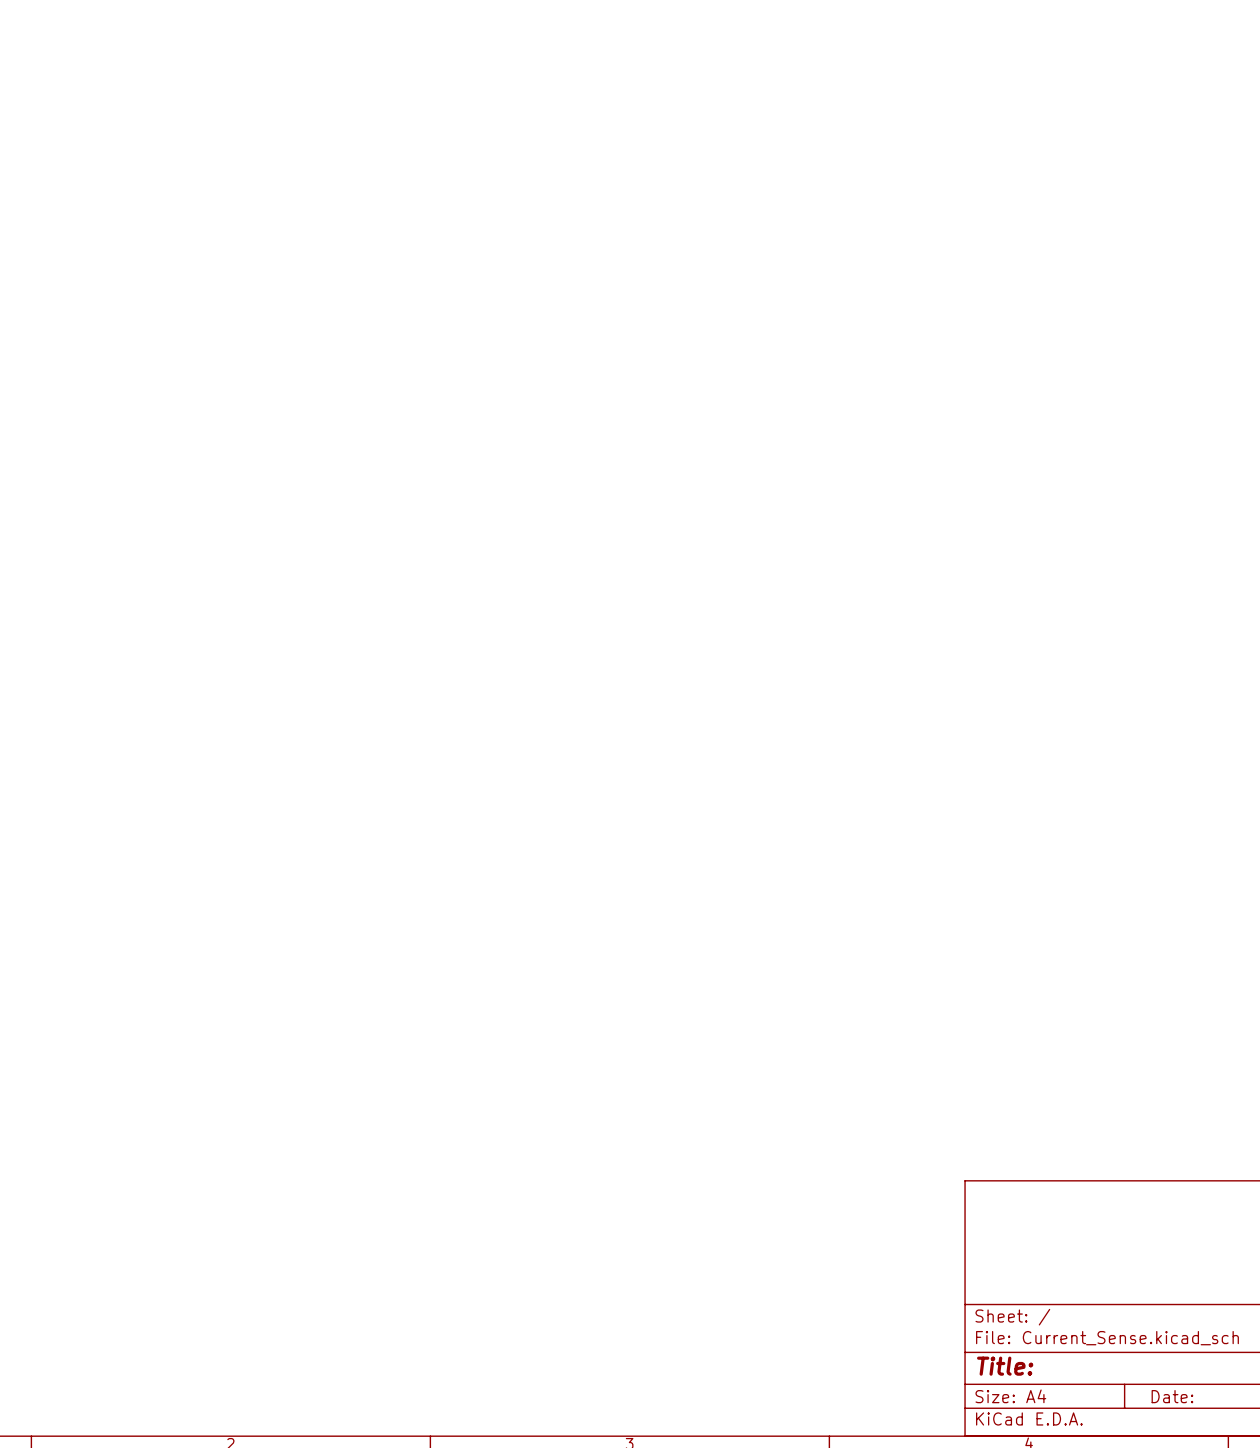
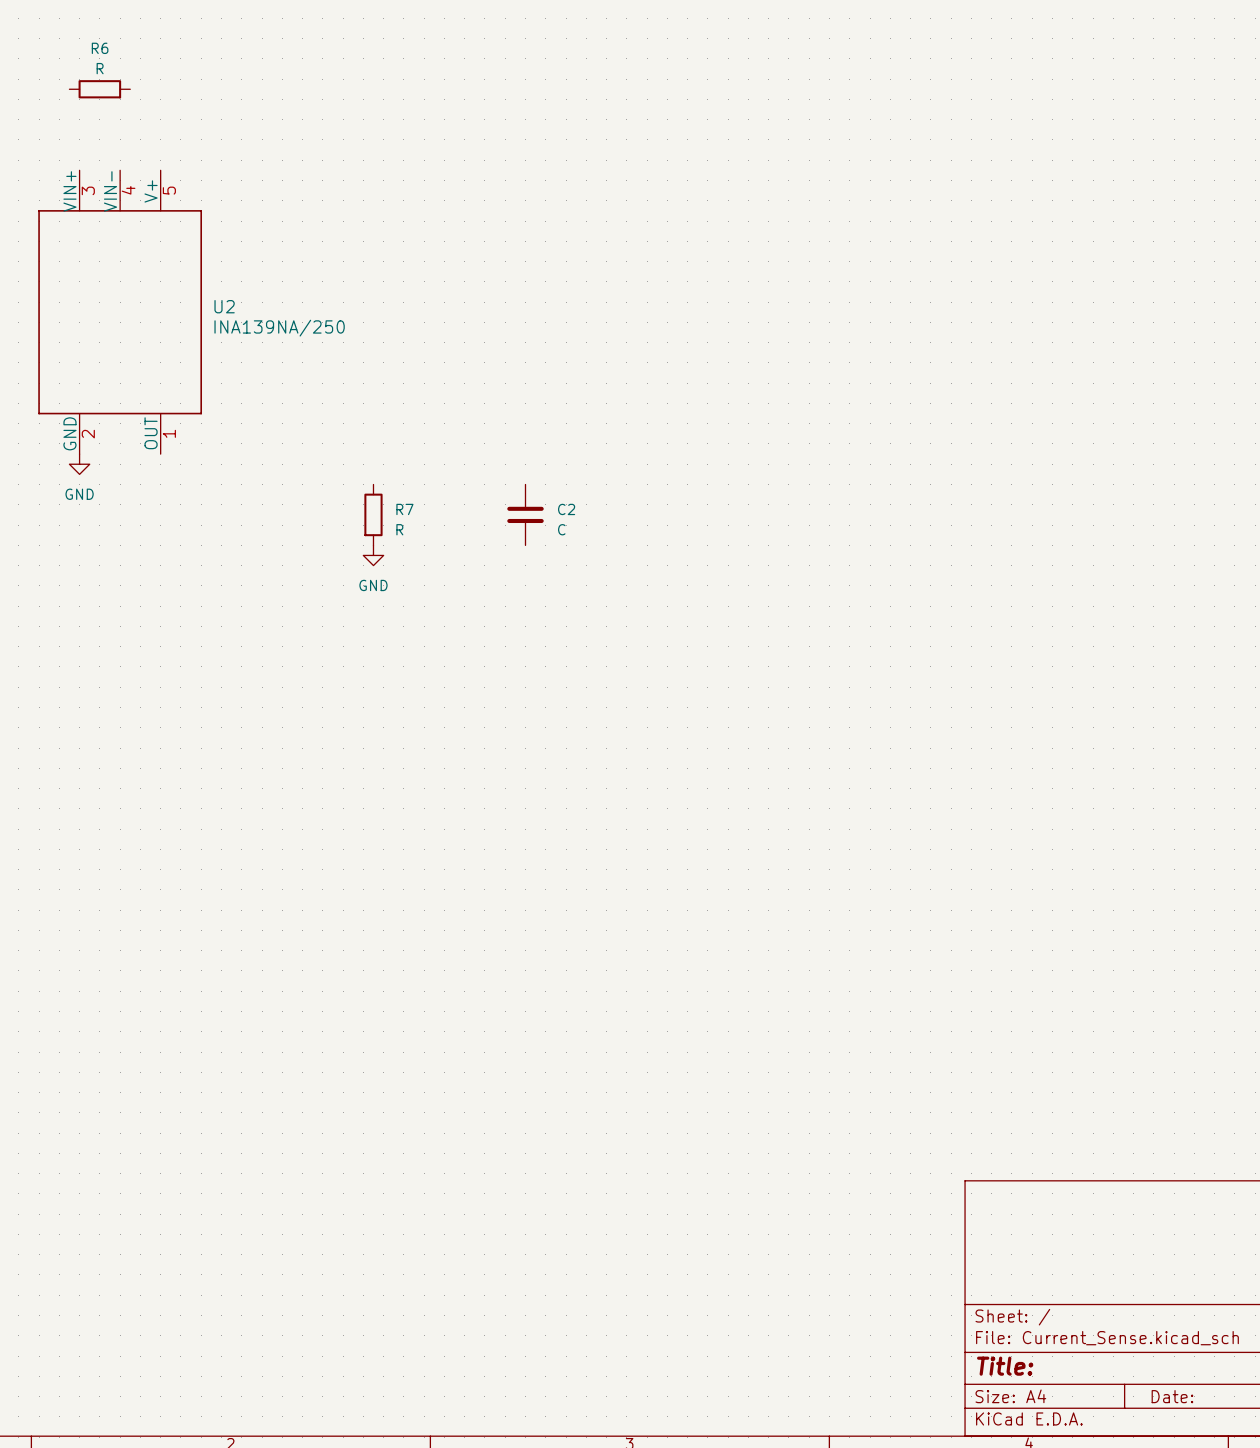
R6: none -> R (99, 89)
U2: none -> INA139NA/250 (120, 312)
power symbol: none -> GND (79, 464)
R7: none -> R (373, 514)
C2: none -> C (525, 514)
power symbol: none -> GND (373, 555)

